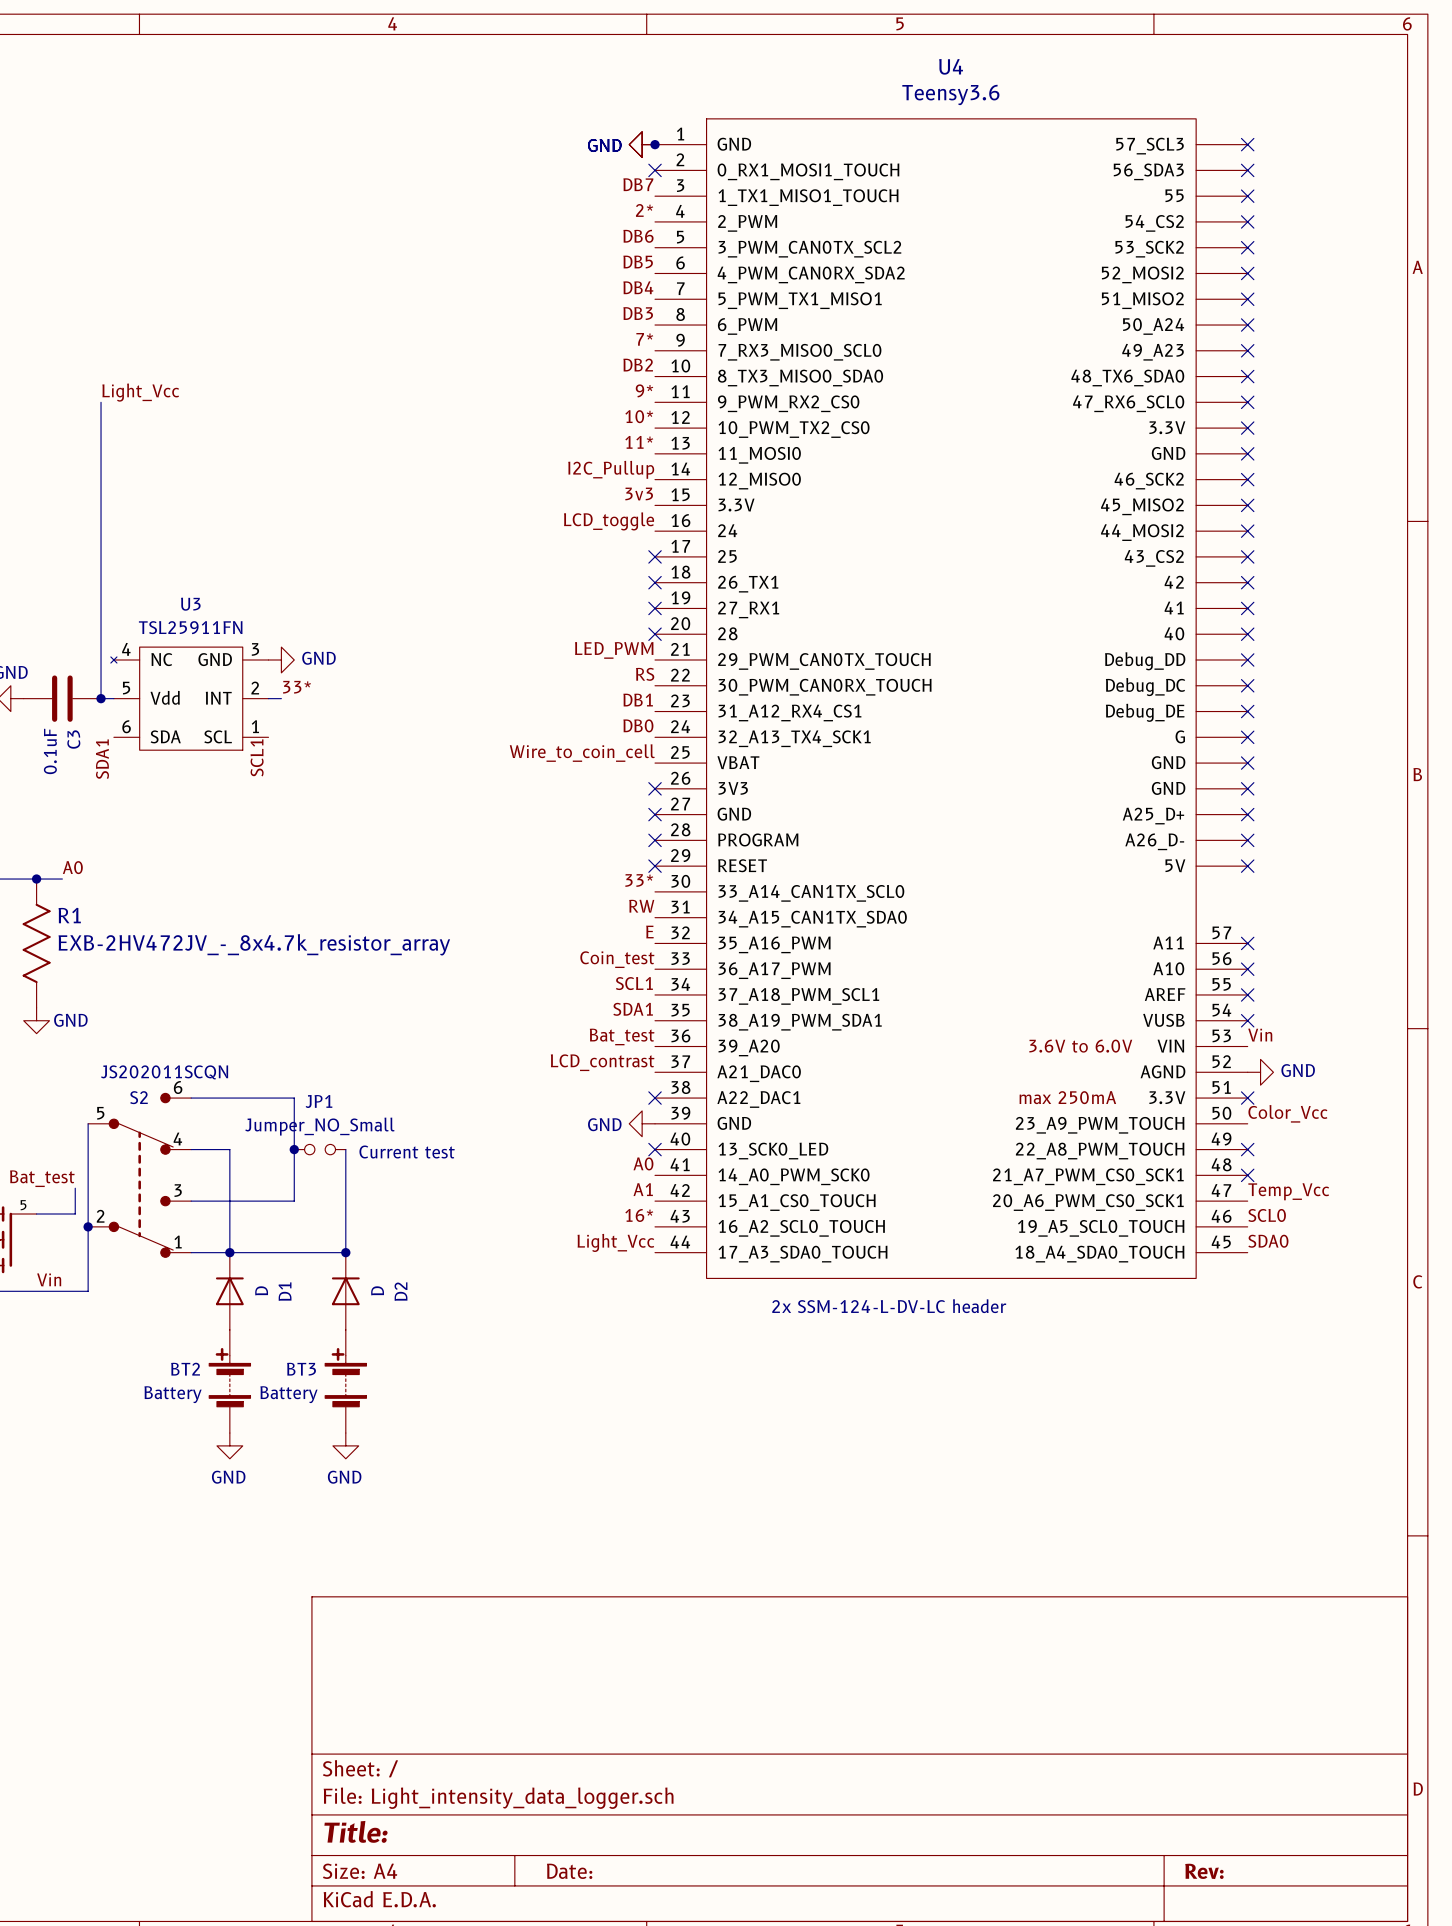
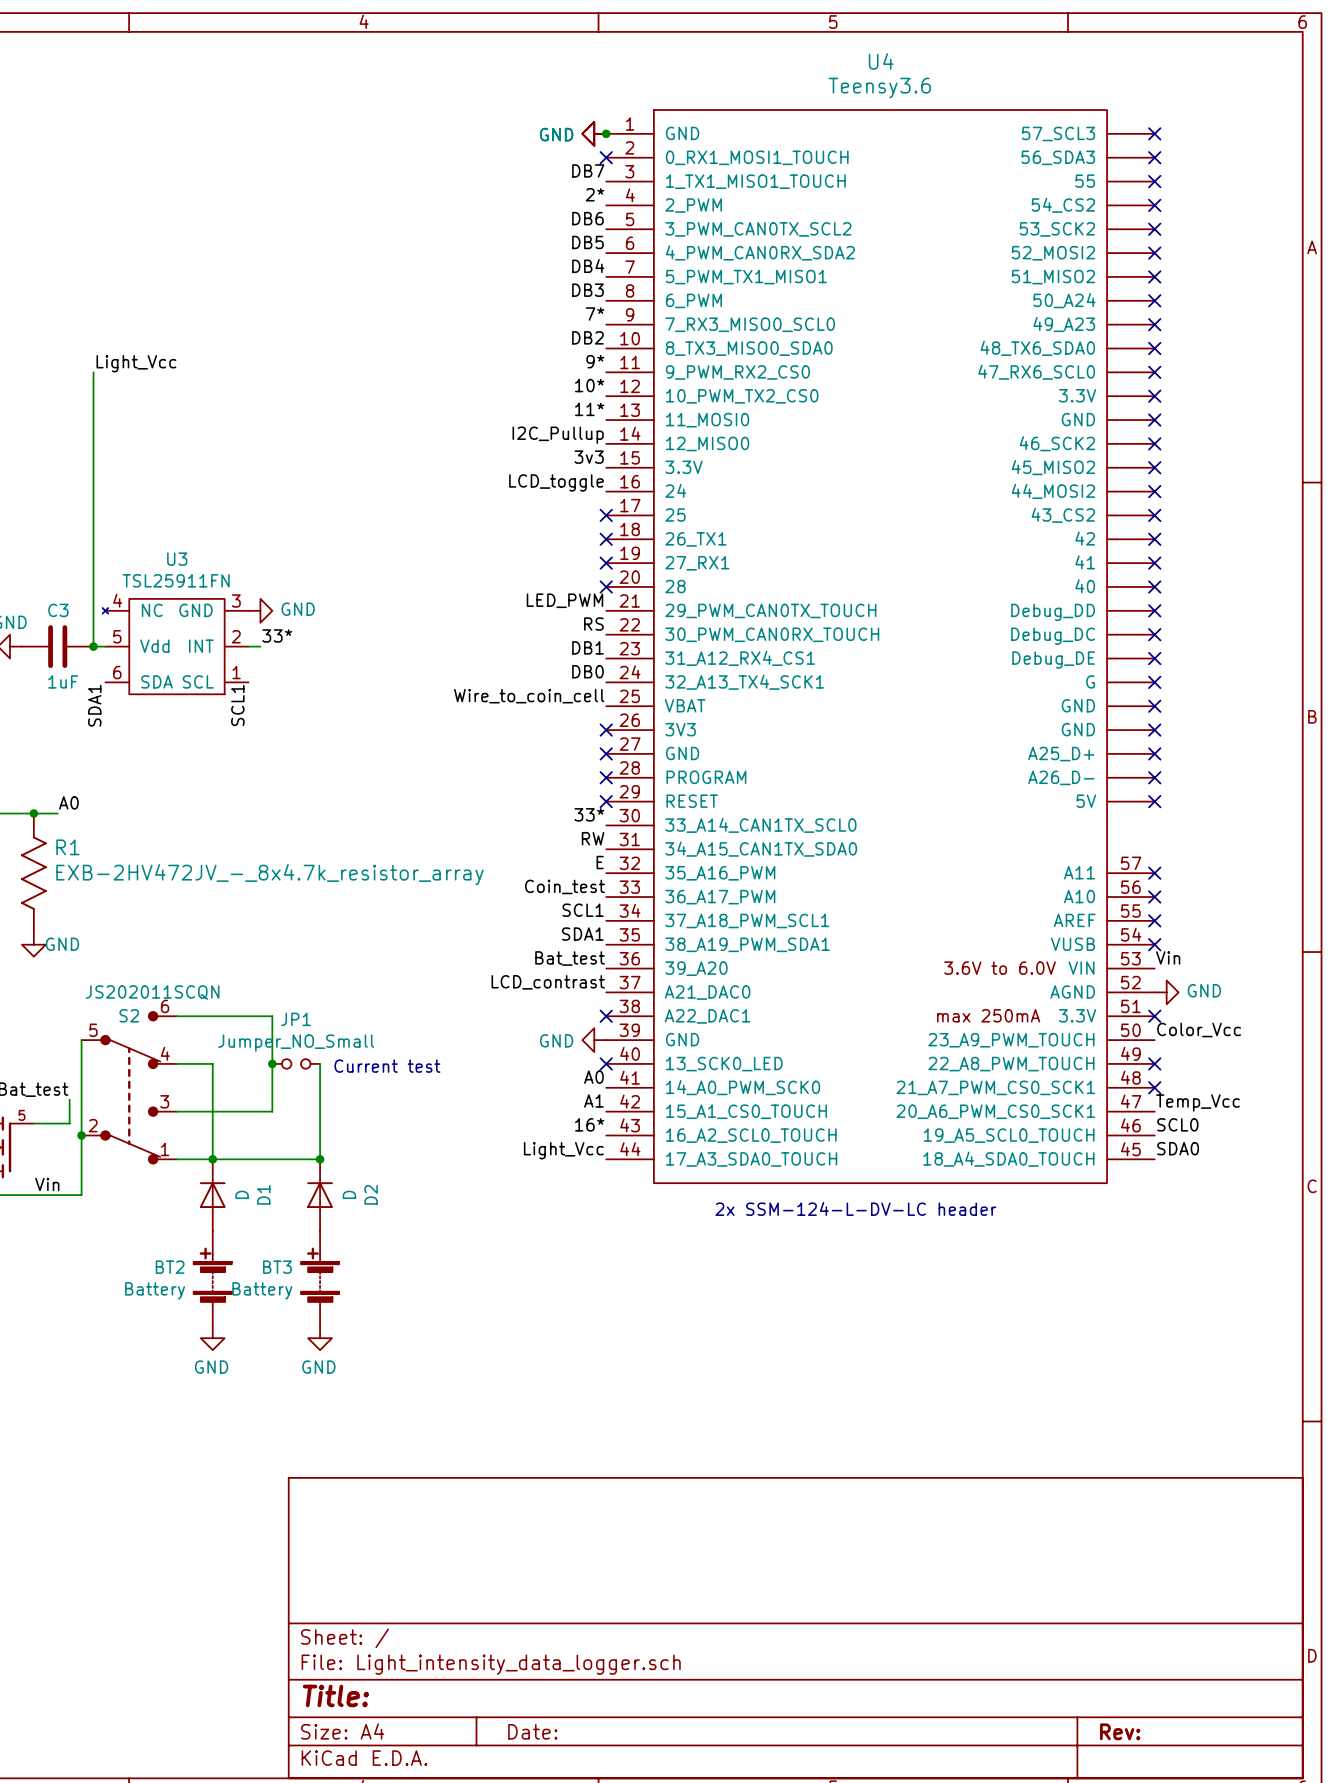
C3 name rotation: 0° (73, 739) -> 90° clockwise (58, 610)
C3 name position: C3 (73, 739) -> C3 (58, 610)
C3 value: 0.1uF (50, 751) -> 1uF (63, 681)

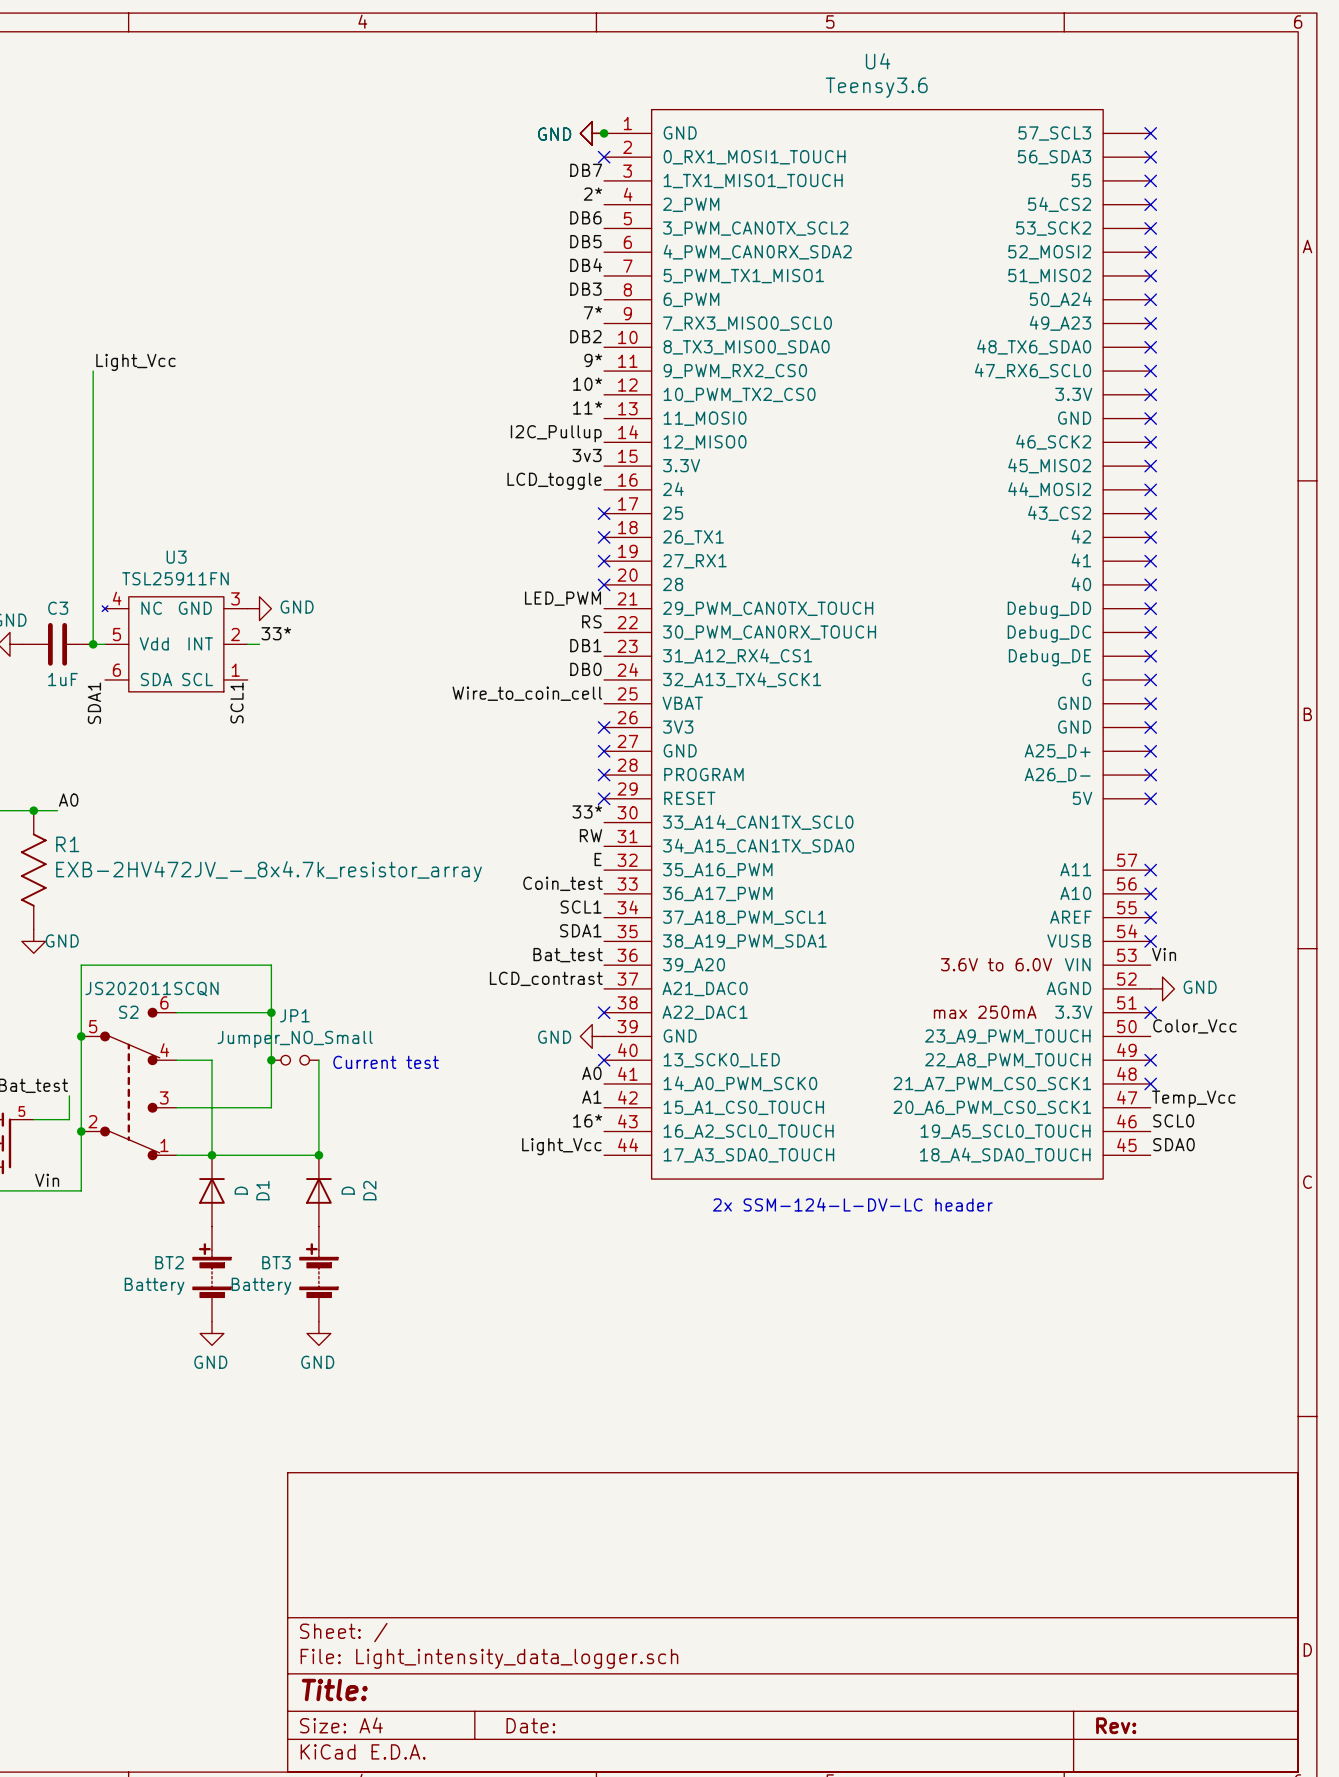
wire: none -> (271, 1012) (271, 965) (81, 965) (81, 1036)
junction: none -> (271, 1012)
junction: none -> (81, 1036)

